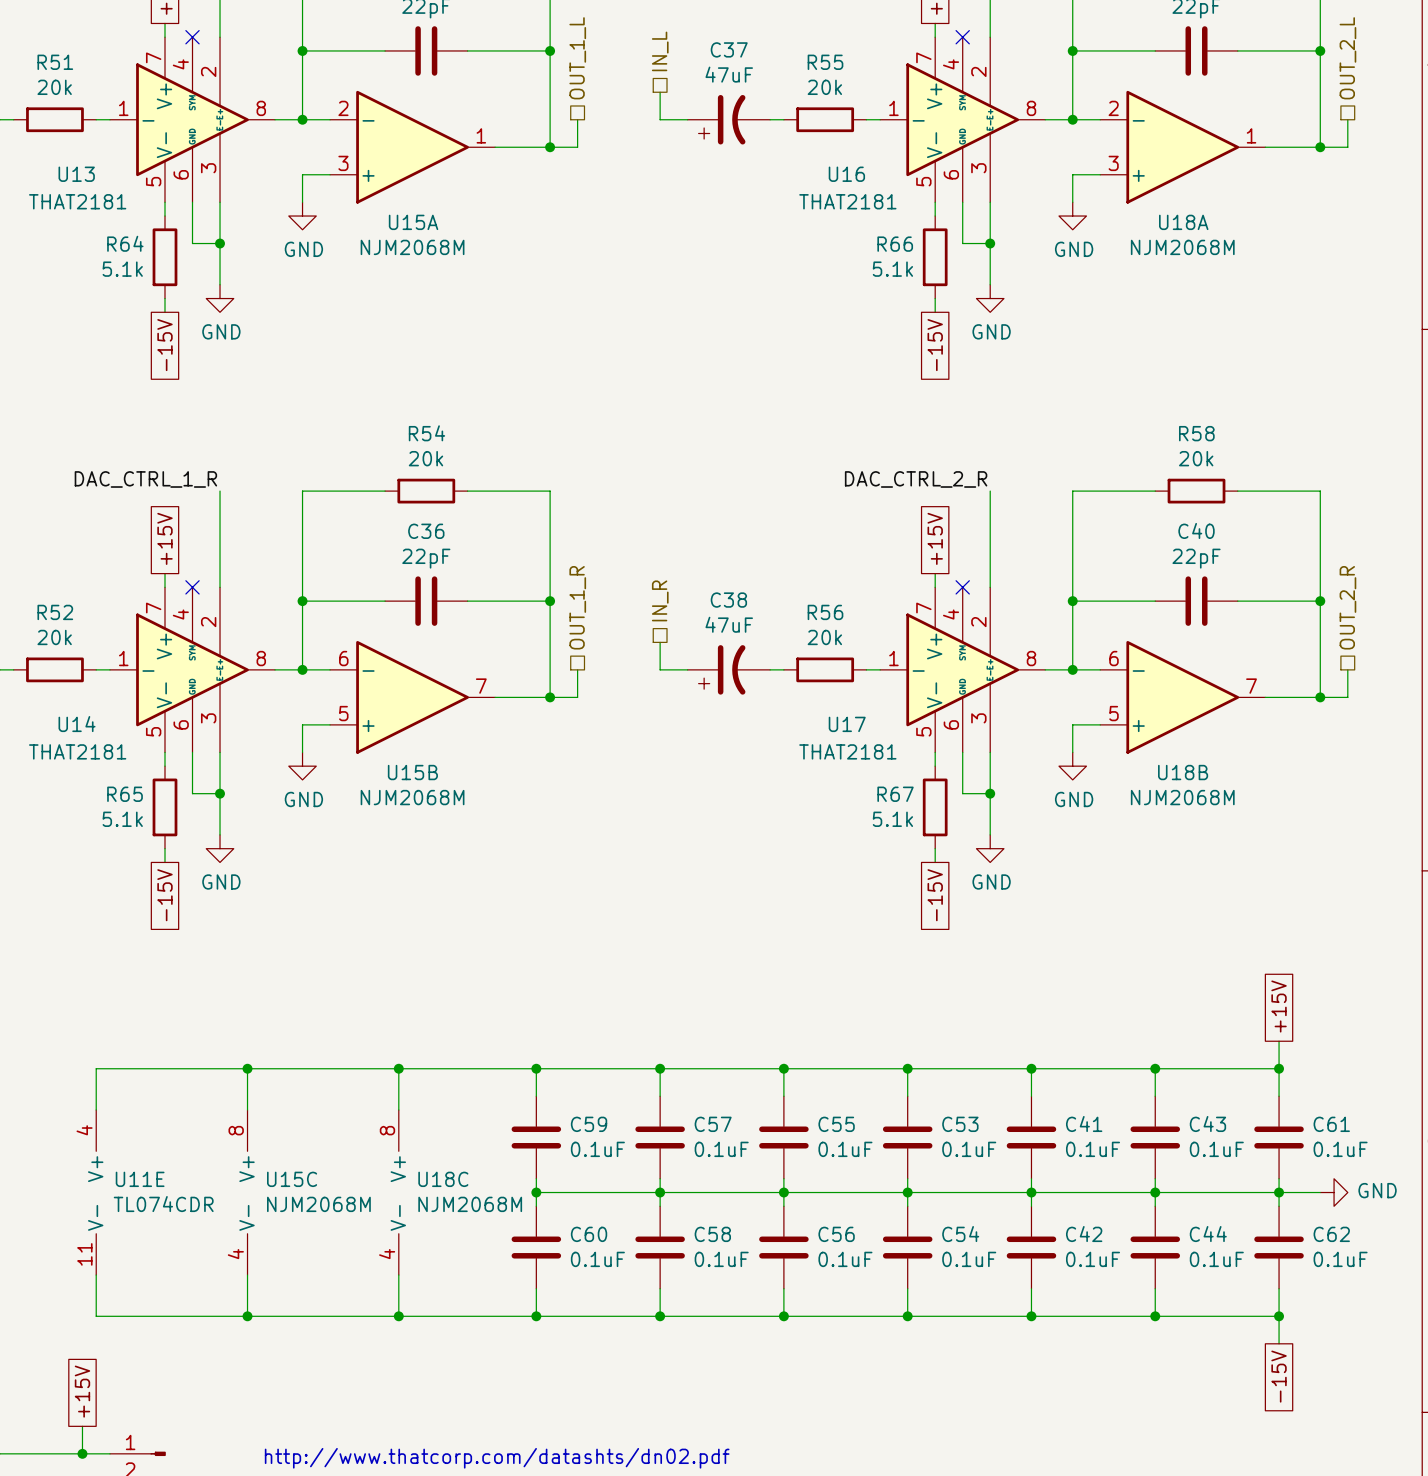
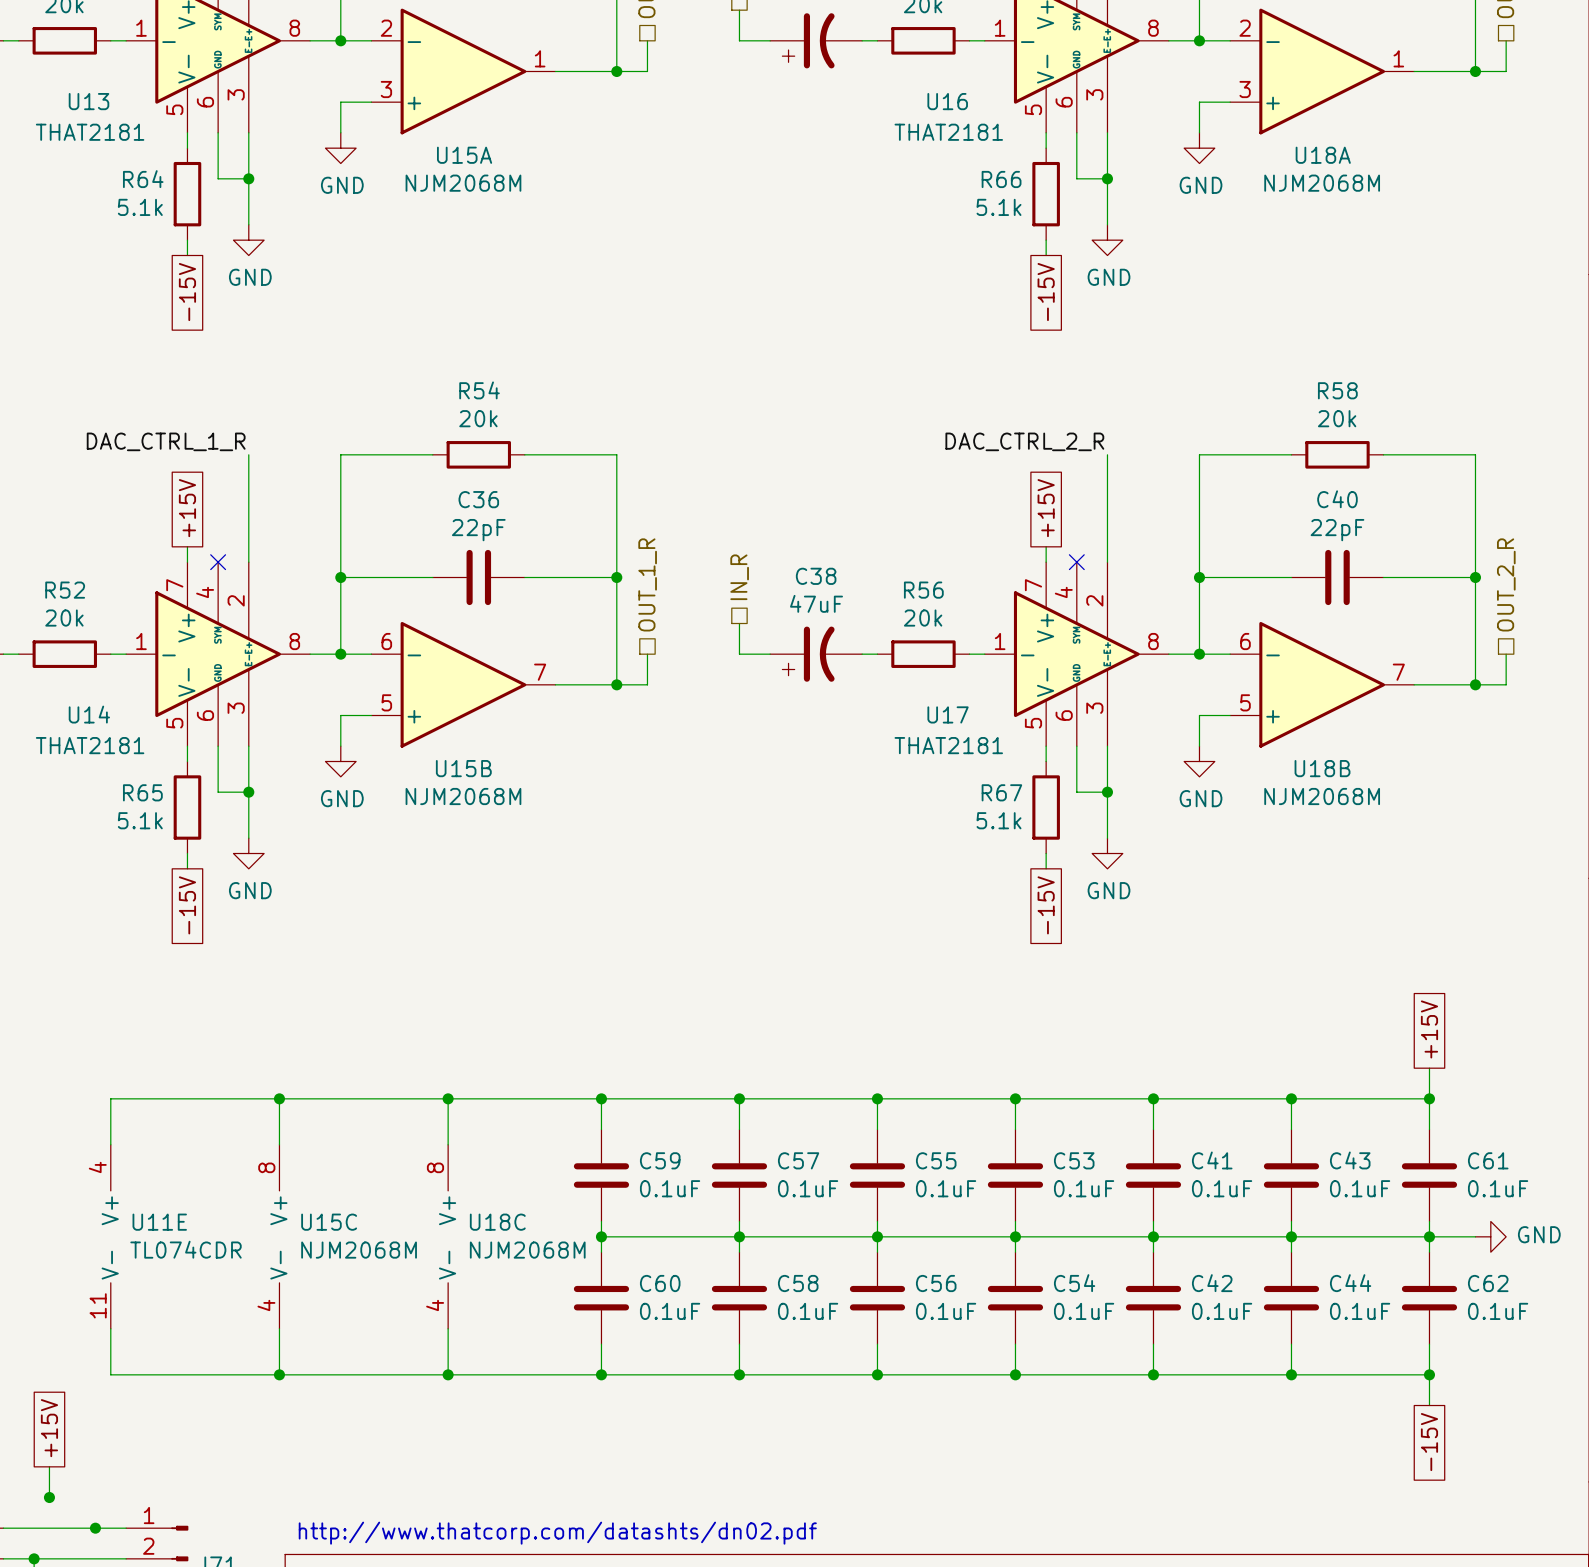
global label position: +15V (82, 1391) -> +15V (49, 1428)
junction: none -> (49, 1497)
wire: (82, 1426) (82, 1453) -> (49, 1466) (49, 1497)

